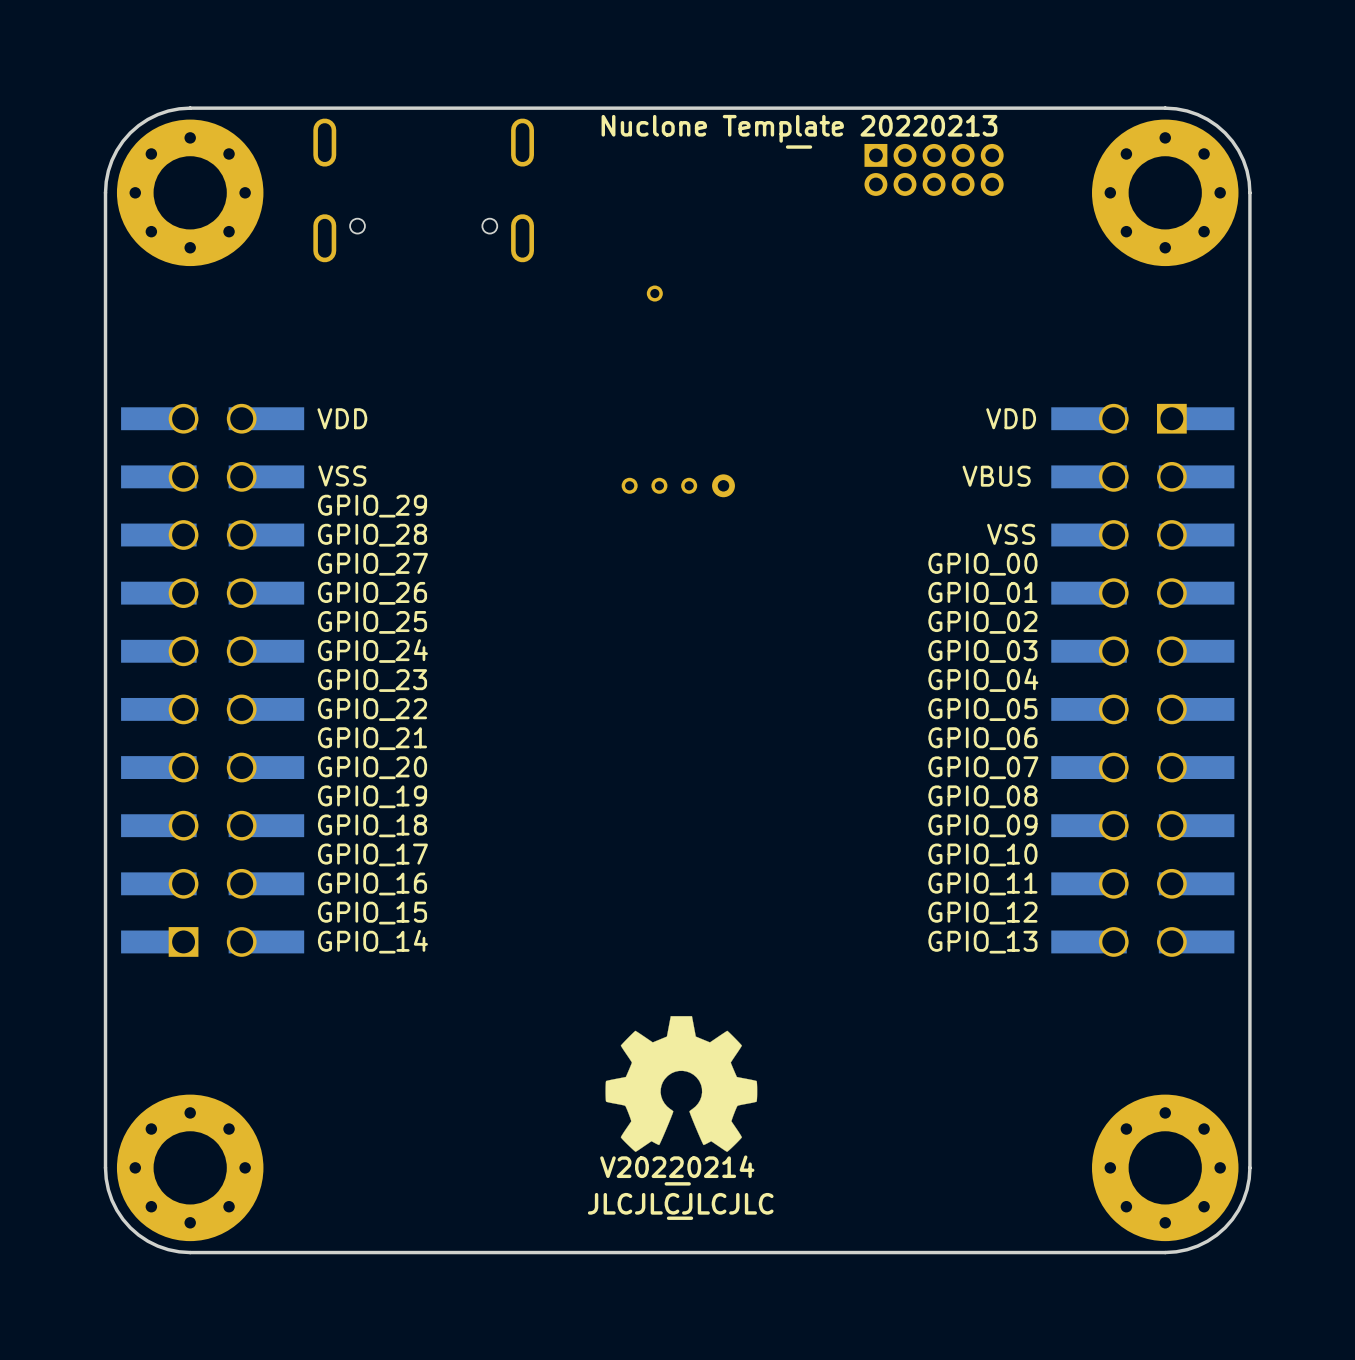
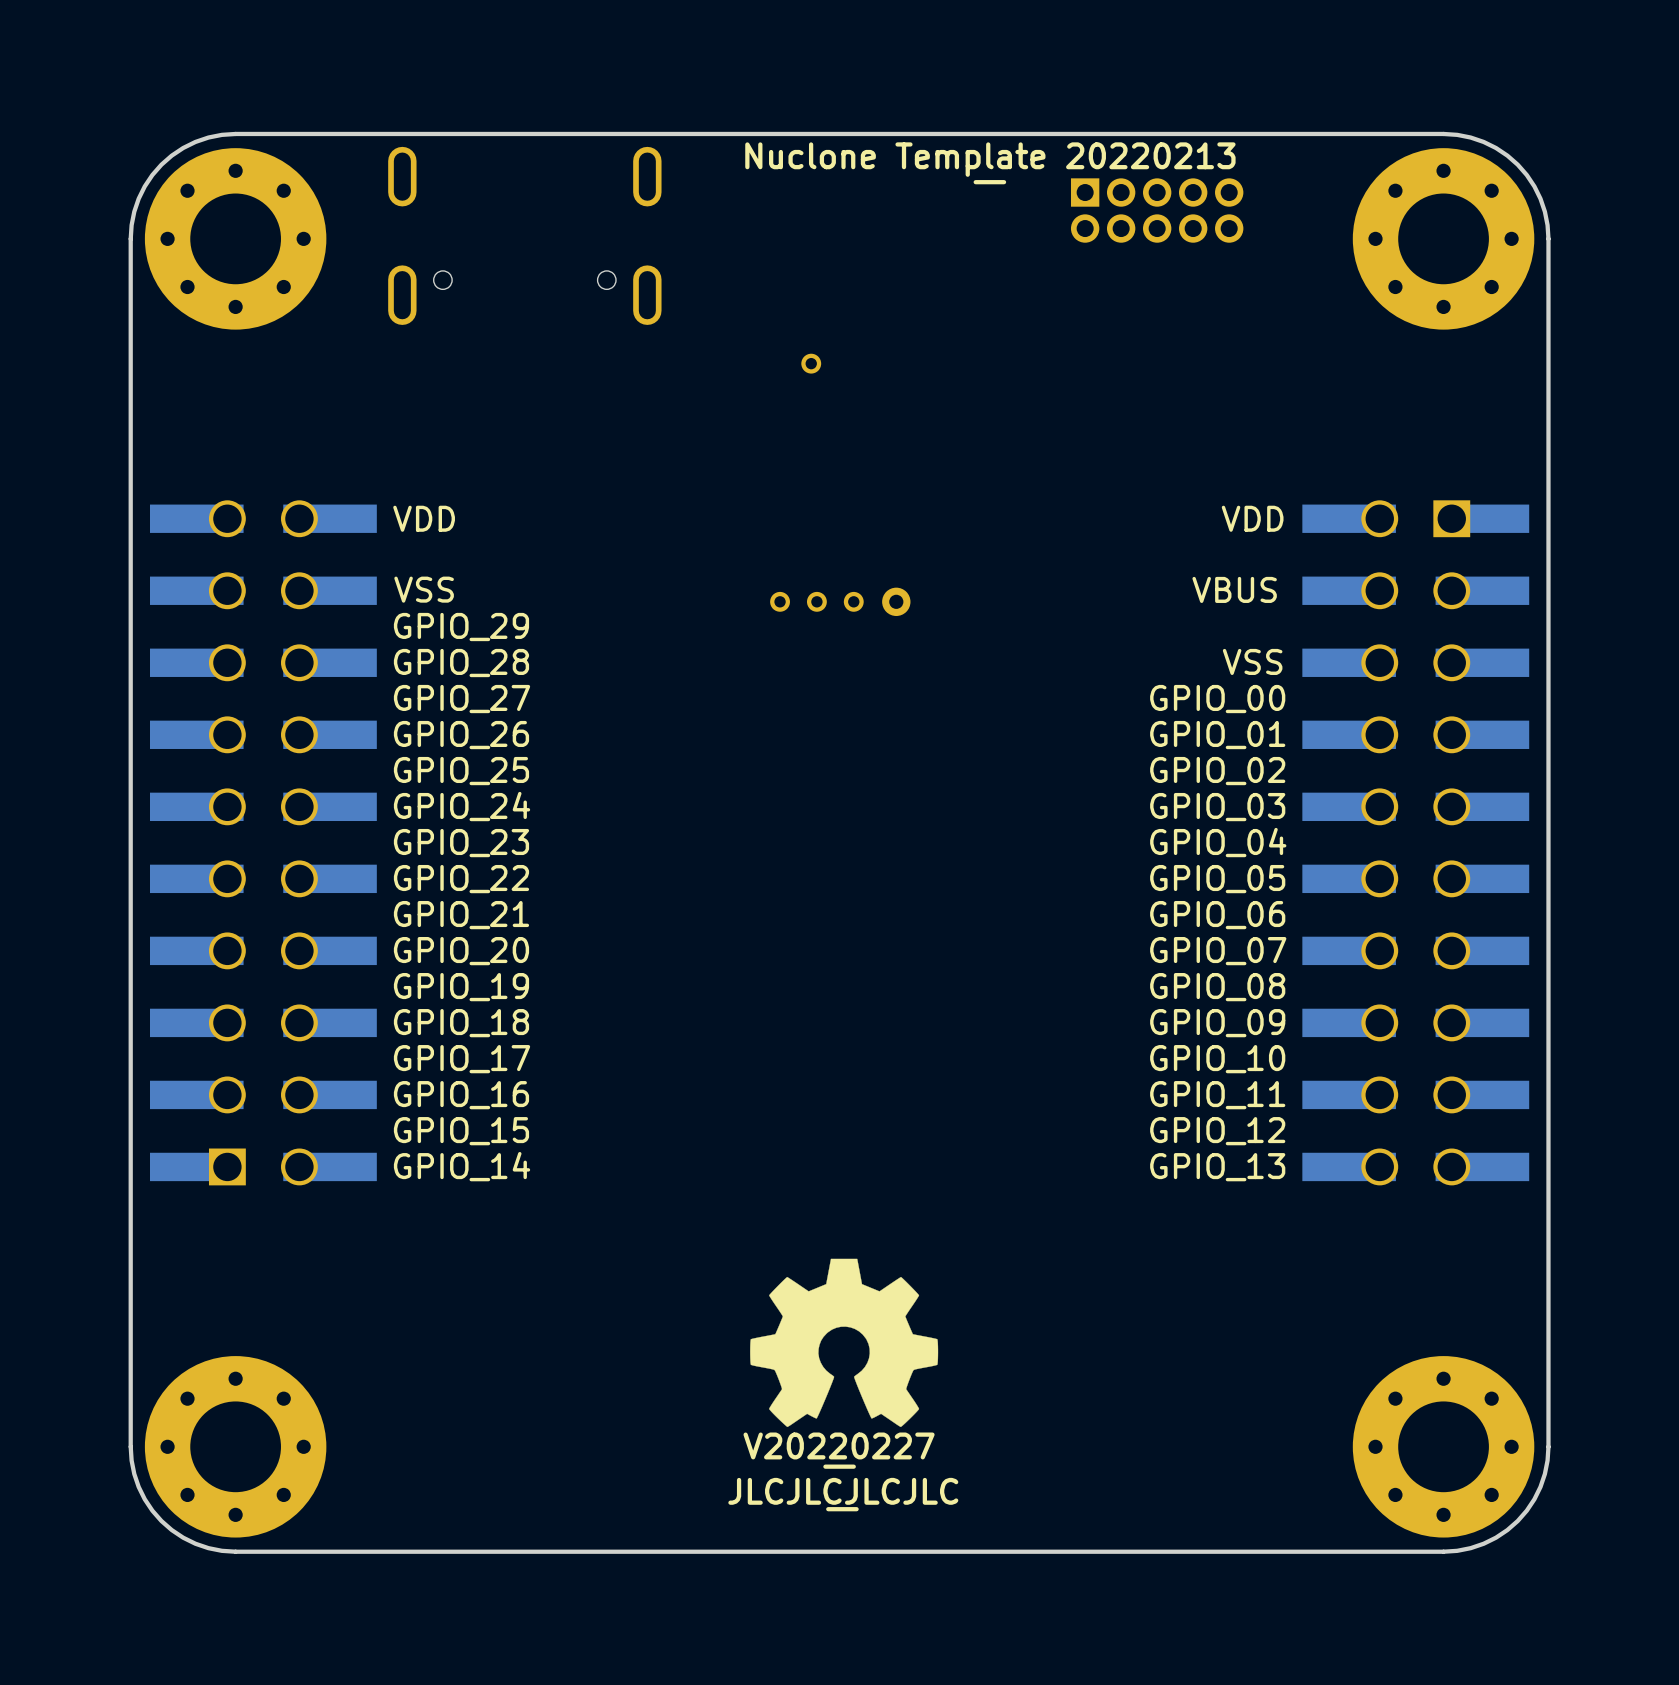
drawing shape: [600, 1155, 755, 1186] -> [743, 1432, 935, 1469]

